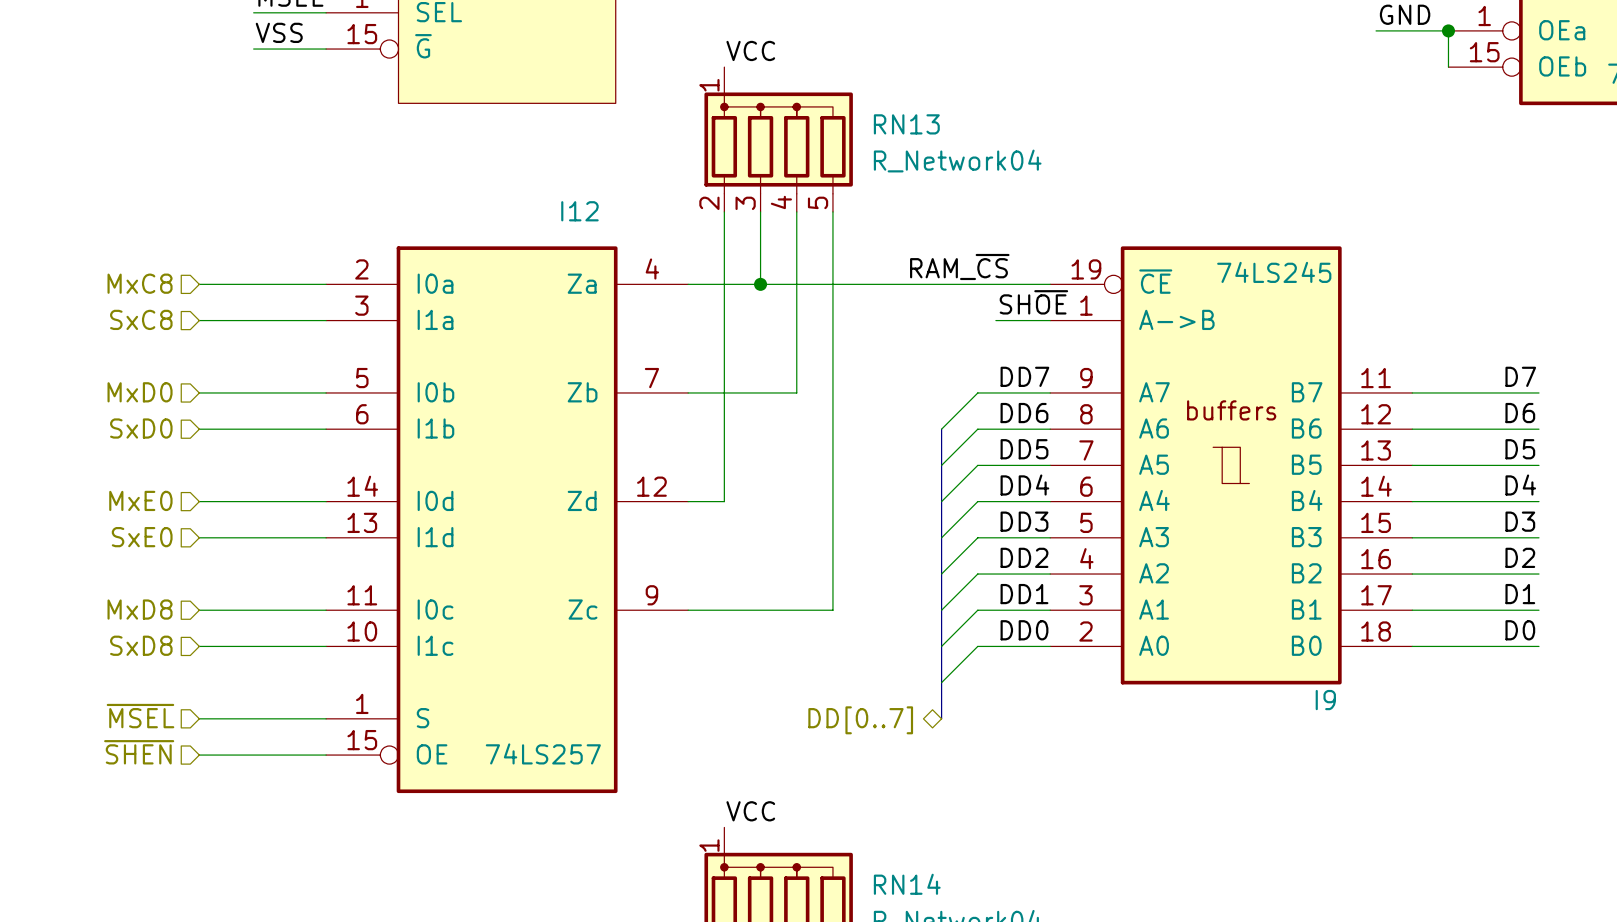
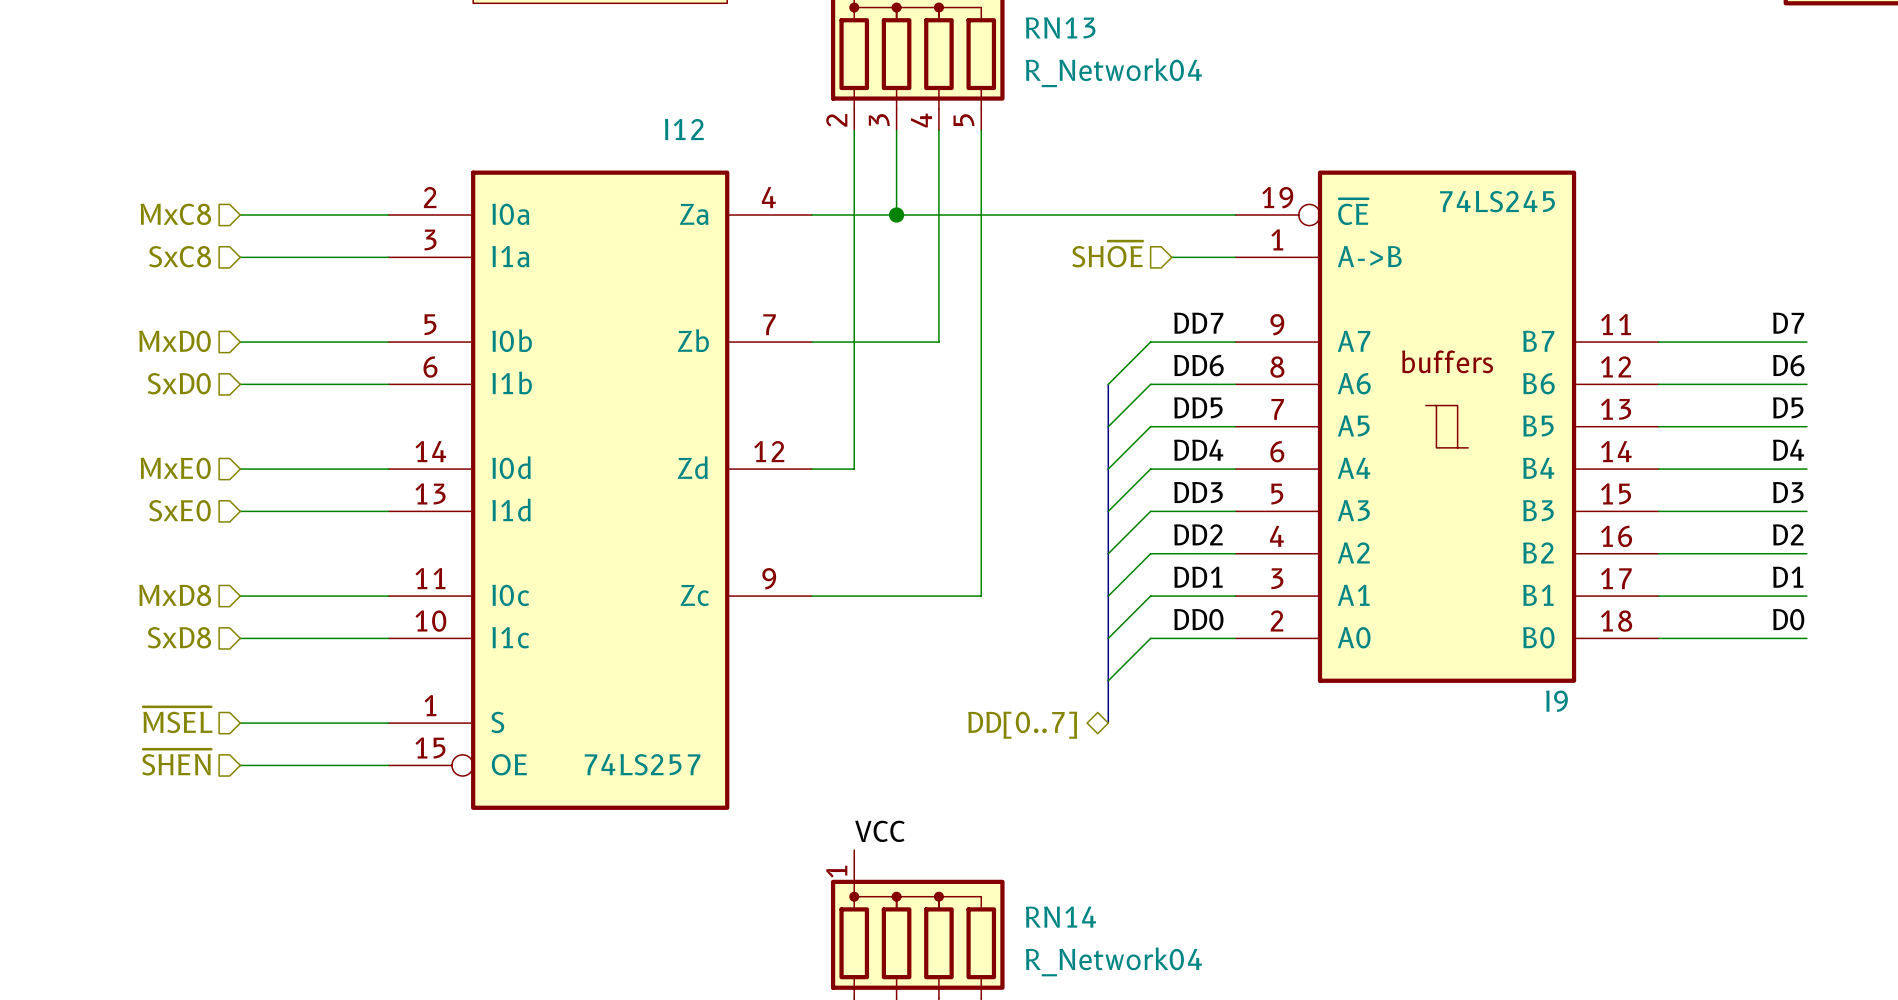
label: RAM_~{CS} (959, 266) -> none
label: SH~{OE} (1033, 302) -> none
hierarchical label: none -> SH~{OE} (1107, 254)

